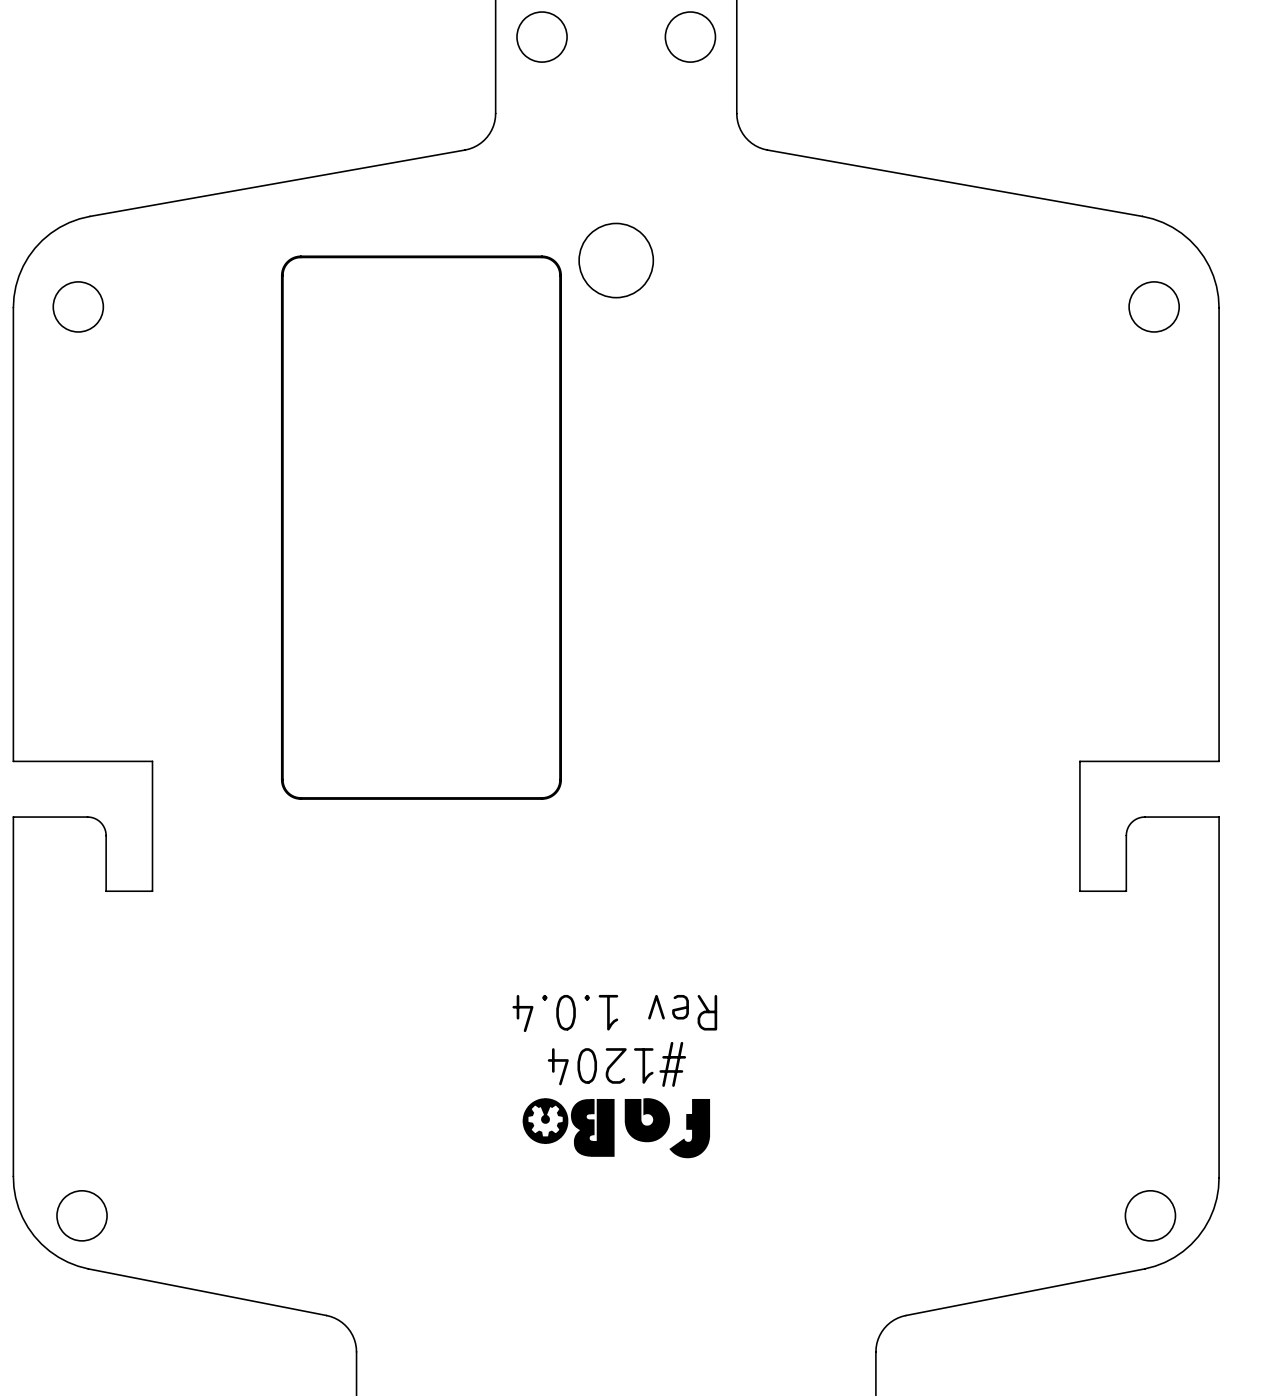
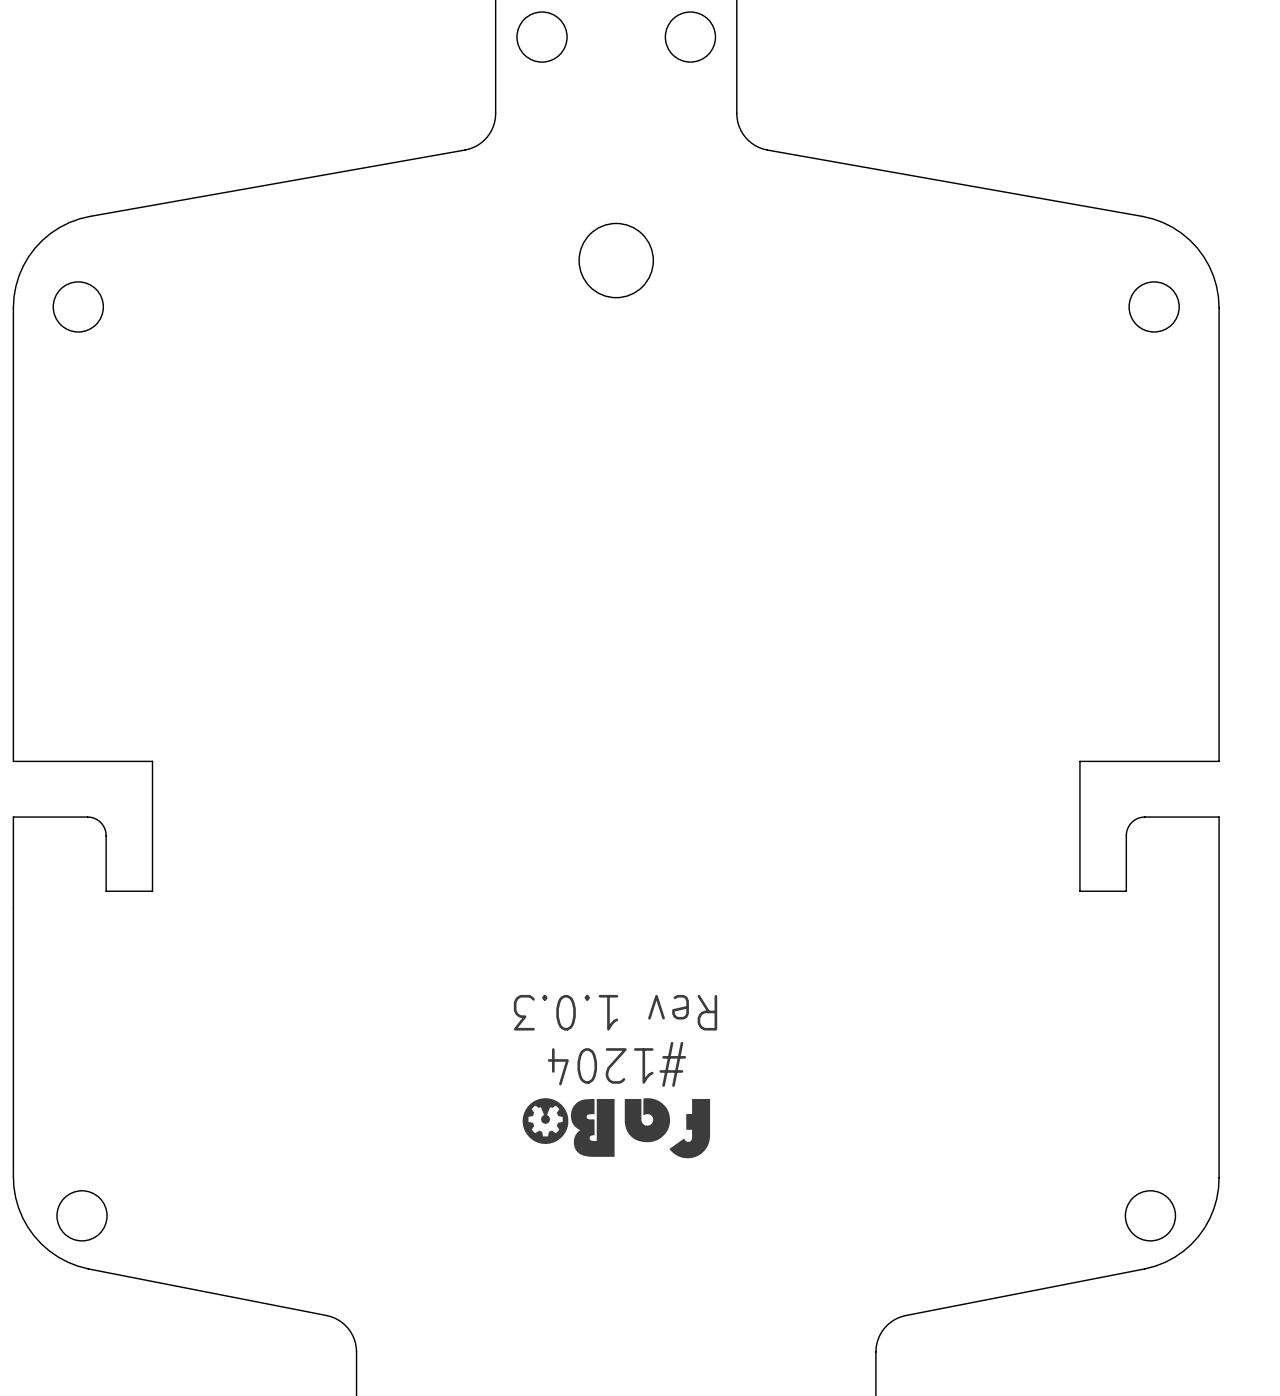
board edge: (300, 256) (542, 256) (553, 260) (559, 268) (560, 779) (556, 791) (549, 797) (300, 798) (289, 794) (283, 787) (282, 275) (287, 262) (300, 256) -> none
text: Rev 1.0.4 (614, 1013) -> Rev 1.0.3 (615, 1012)

